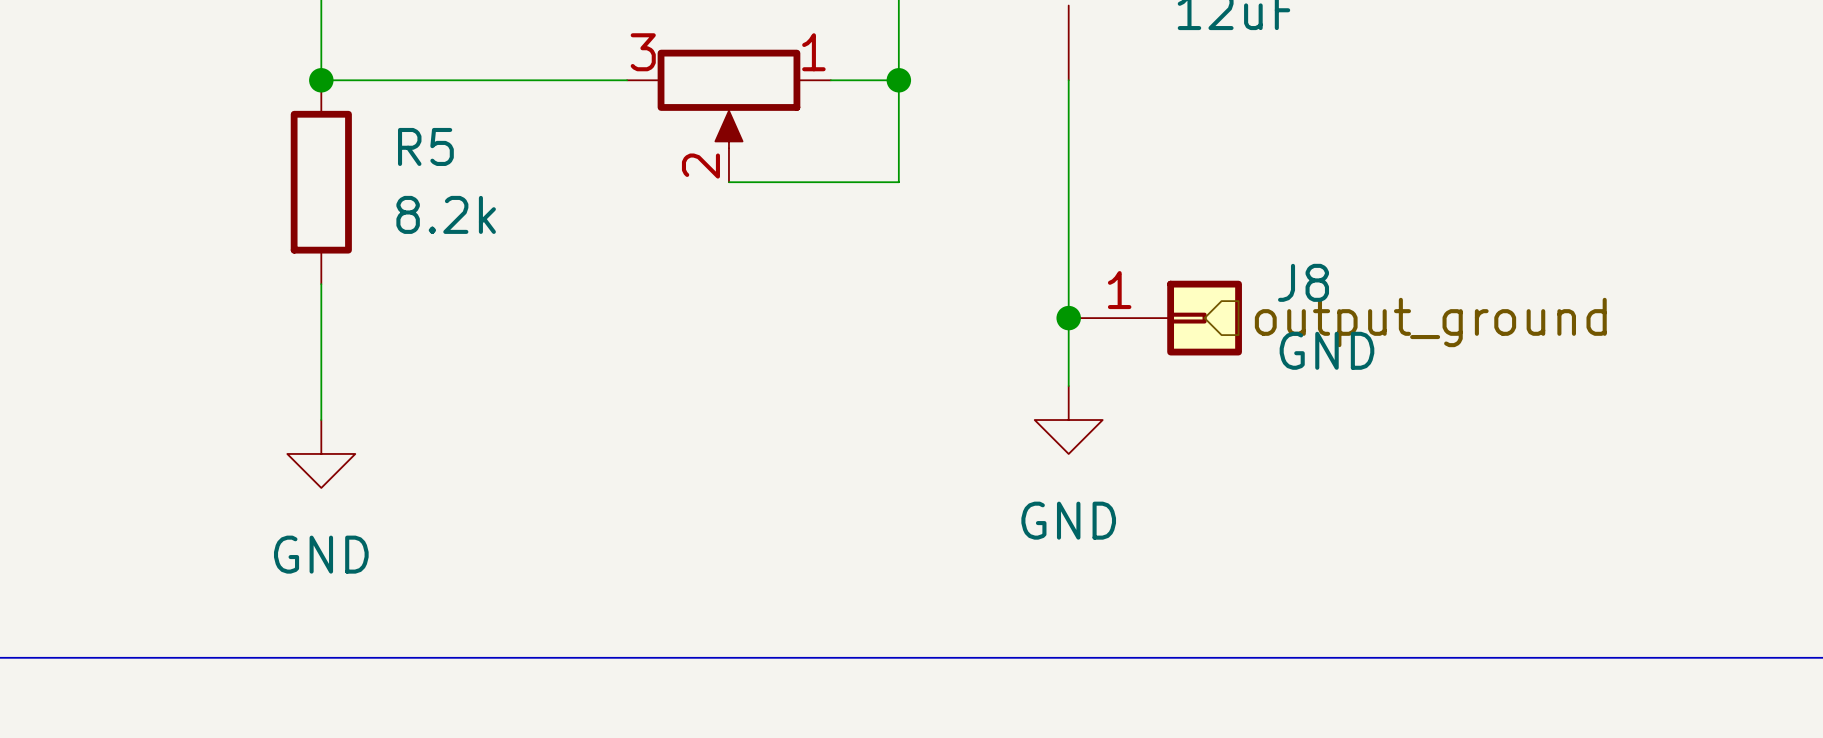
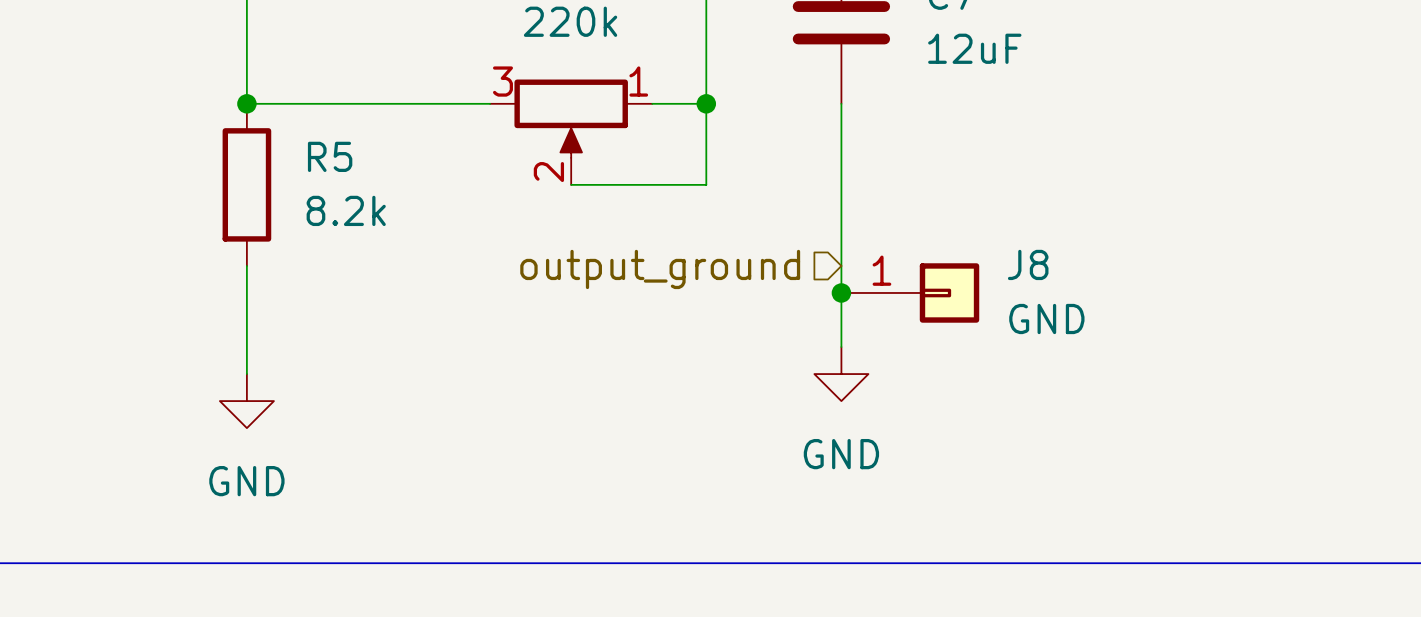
hierarchical label rotation: 0° (1430, 322) -> 180° (660, 269)
hierarchical label position: output_ground (1430, 322) -> output_ground (660, 269)

